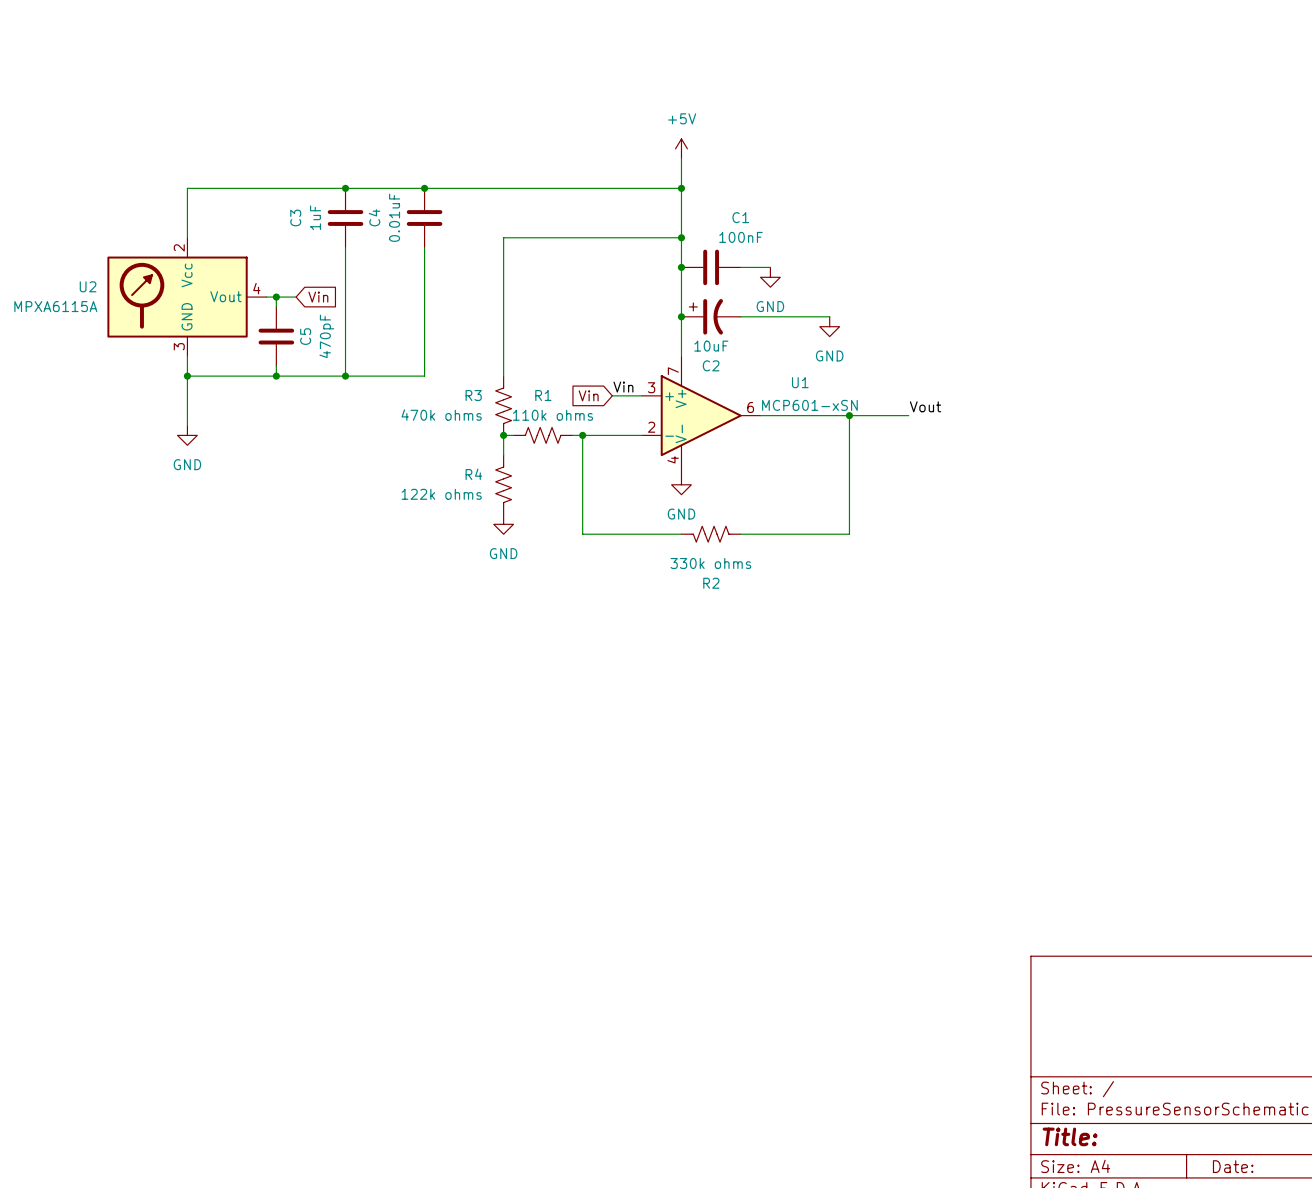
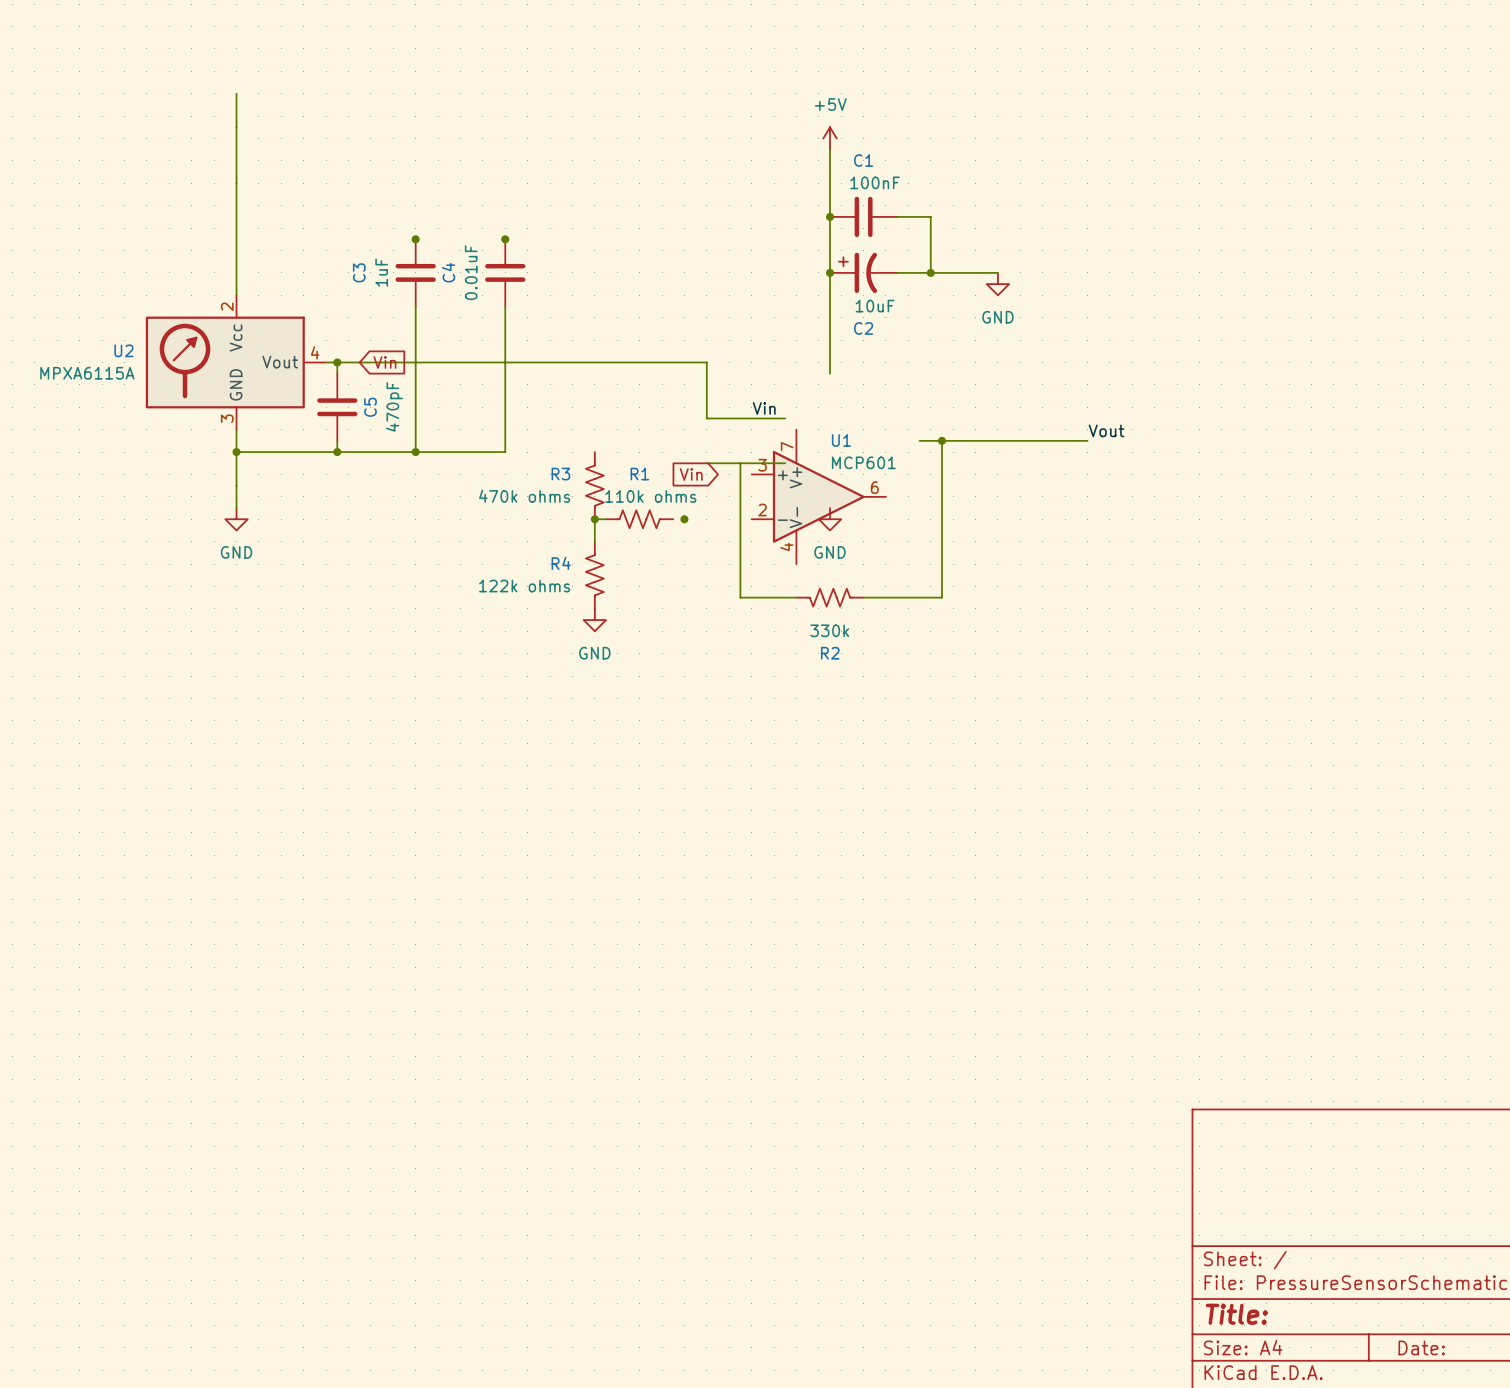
power symbol position: +5V (681, 148) -> +5V (829, 138)
wire: (681, 158) (681, 356) -> (829, 149) (829, 373)
junction: none -> (829, 216)
wire: none -> (897, 216) (930, 216) (930, 272)
wire: (187, 188) (681, 188) -> (236, 239) (236, 93)
junction: (681, 188) -> none
C1 name position: C1 (740, 217) -> C1 (863, 160)
junction: none -> (829, 272)
junction: none -> (930, 272)
power symbol: none -> GND (997, 284)
wire: (681, 237) (503, 237) (503, 376) -> none
junction: (681, 237) -> none
C1 value position: 100nF (741, 237) -> 100nF (875, 182)
junction: (681, 267) -> none
C1 position: (711, 267) -> (863, 216)
wire: (740, 267) (770, 267) -> none
power symbol: GND (770, 277) -> none
wire: none -> (359, 362) (706, 362) (706, 418) (785, 418)
junction: (681, 316) -> none
C2 position: (711, 316) -> (863, 272)
wire: (740, 316) (829, 316) -> (897, 272) (997, 272)
power symbol: GND (829, 326) -> none
C2 value position: 10uF (711, 346) -> 10uF (875, 306)
wire: none -> (941, 440) (941, 597) (863, 597)
junction: none -> (941, 440)
U1 name position: U1 (800, 382) -> U1 (841, 440)
wire: none -> (740, 463) (740, 597) (796, 597)
label position: Vin (623, 387) -> Vin (764, 408)
wire: (612, 395) (641, 395) -> none
U1 value: MCP601-xSN (809, 405) -> MCP601 (863, 462)
label position: Vout (925, 406) -> Vout (1106, 430)
wire: (760, 415) (908, 415) -> (919, 440) (1087, 440)
wire: (849, 415) (849, 534) (740, 534) -> none
junction: (849, 415) -> none
wire: (572, 435) (641, 435) -> (706, 463) (785, 463)
wire: (582, 435) (582, 534) (681, 534) -> none
power symbol position: GND (681, 484) -> GND (829, 519)
R2 position: (711, 534) -> (829, 597)
R2 value: 330k ohms (710, 563) -> 330k (829, 630)

